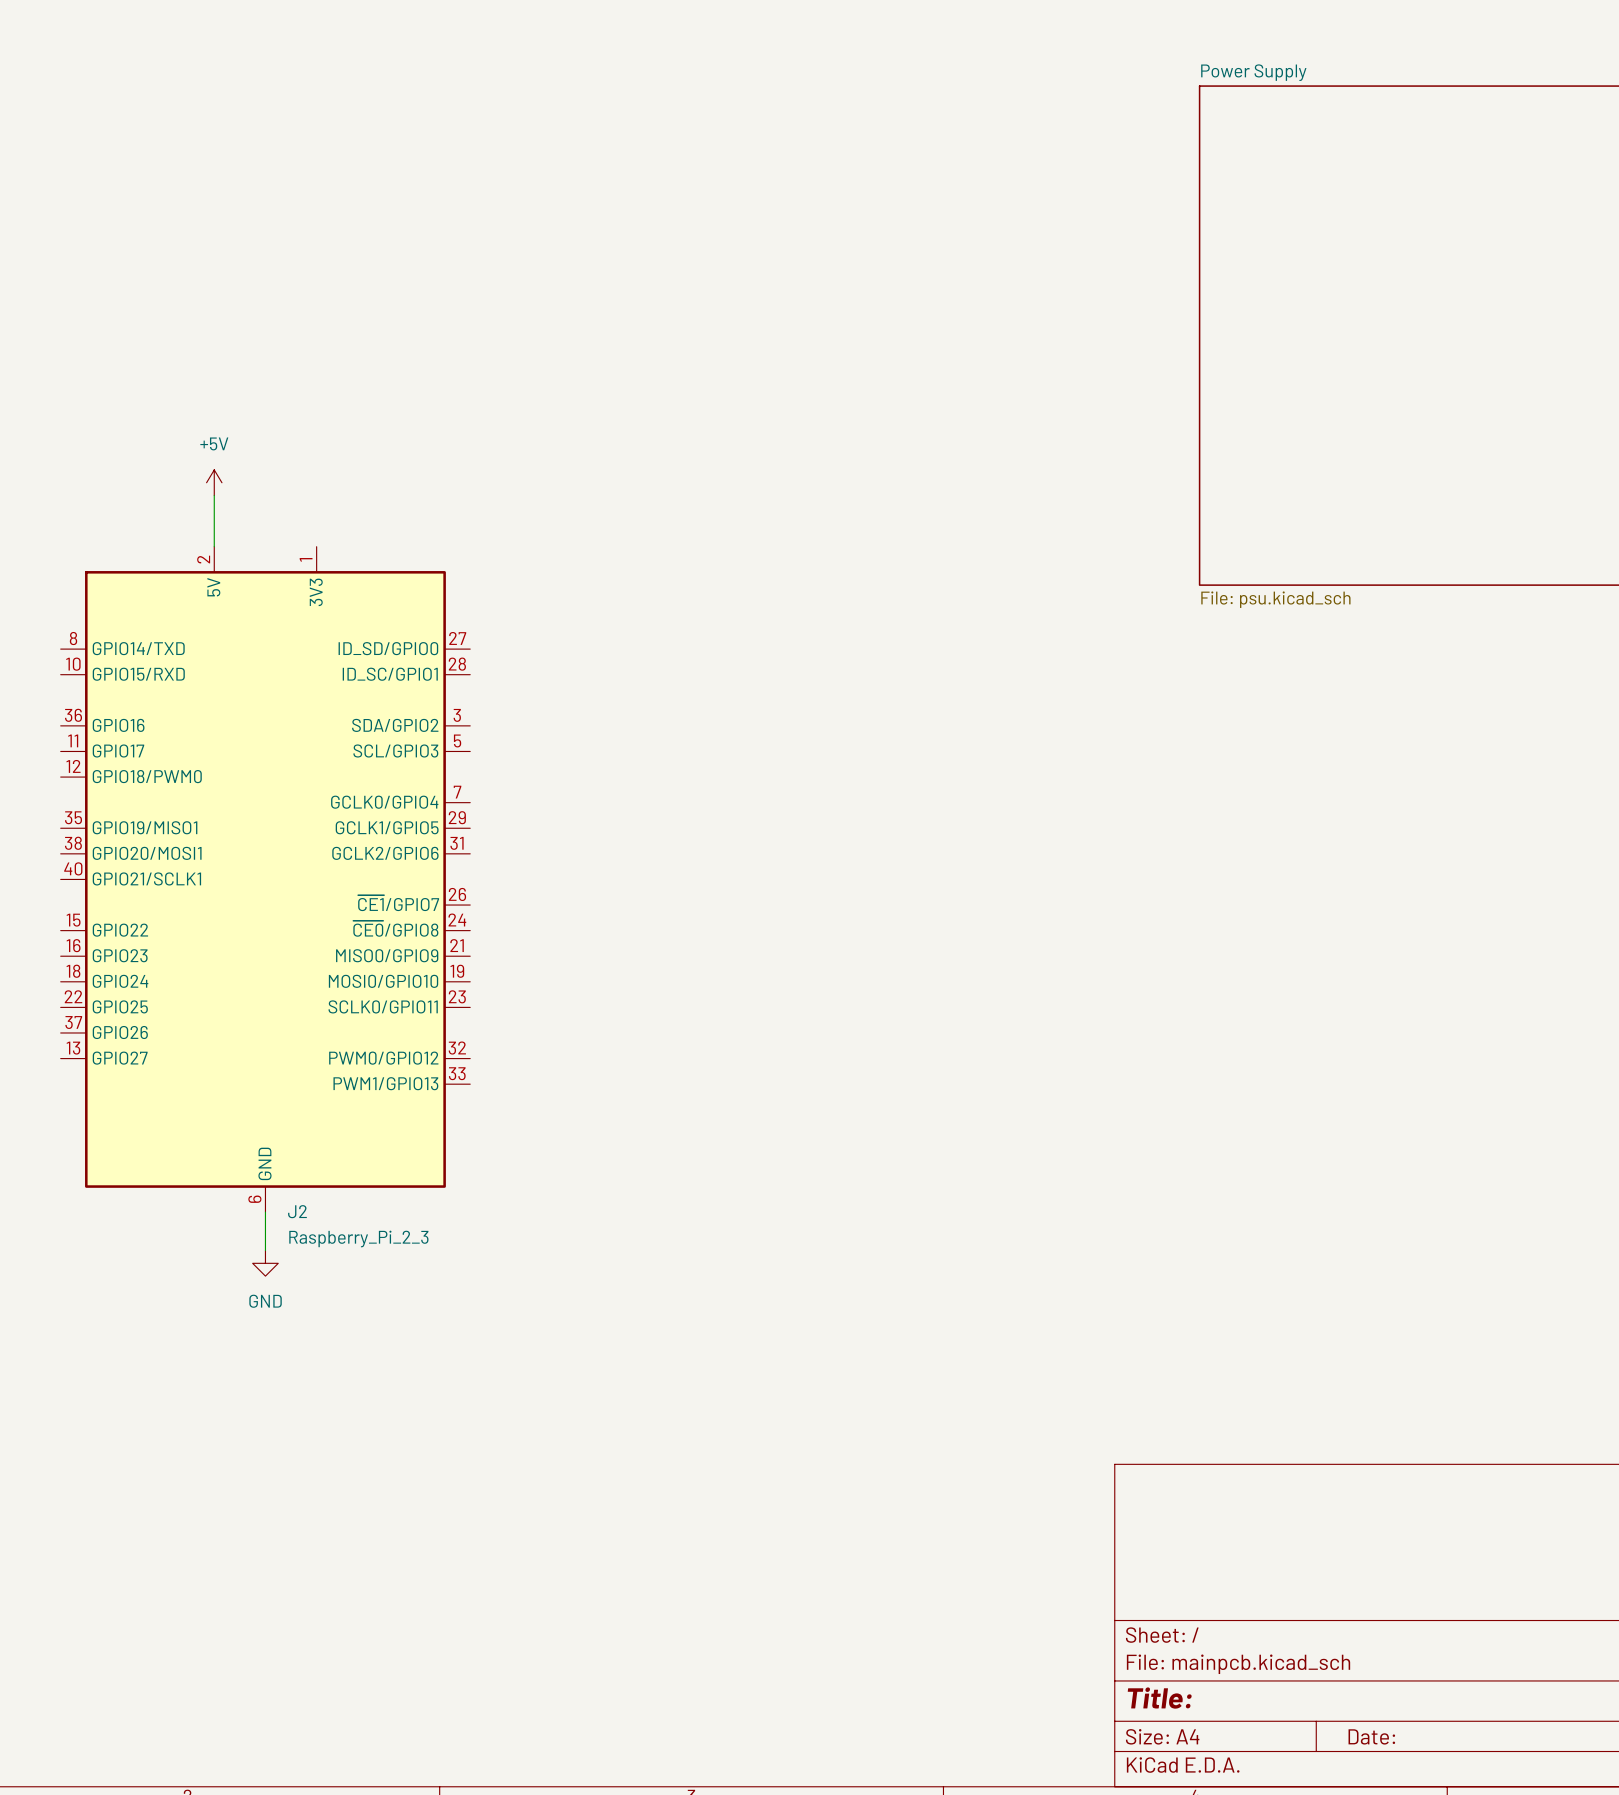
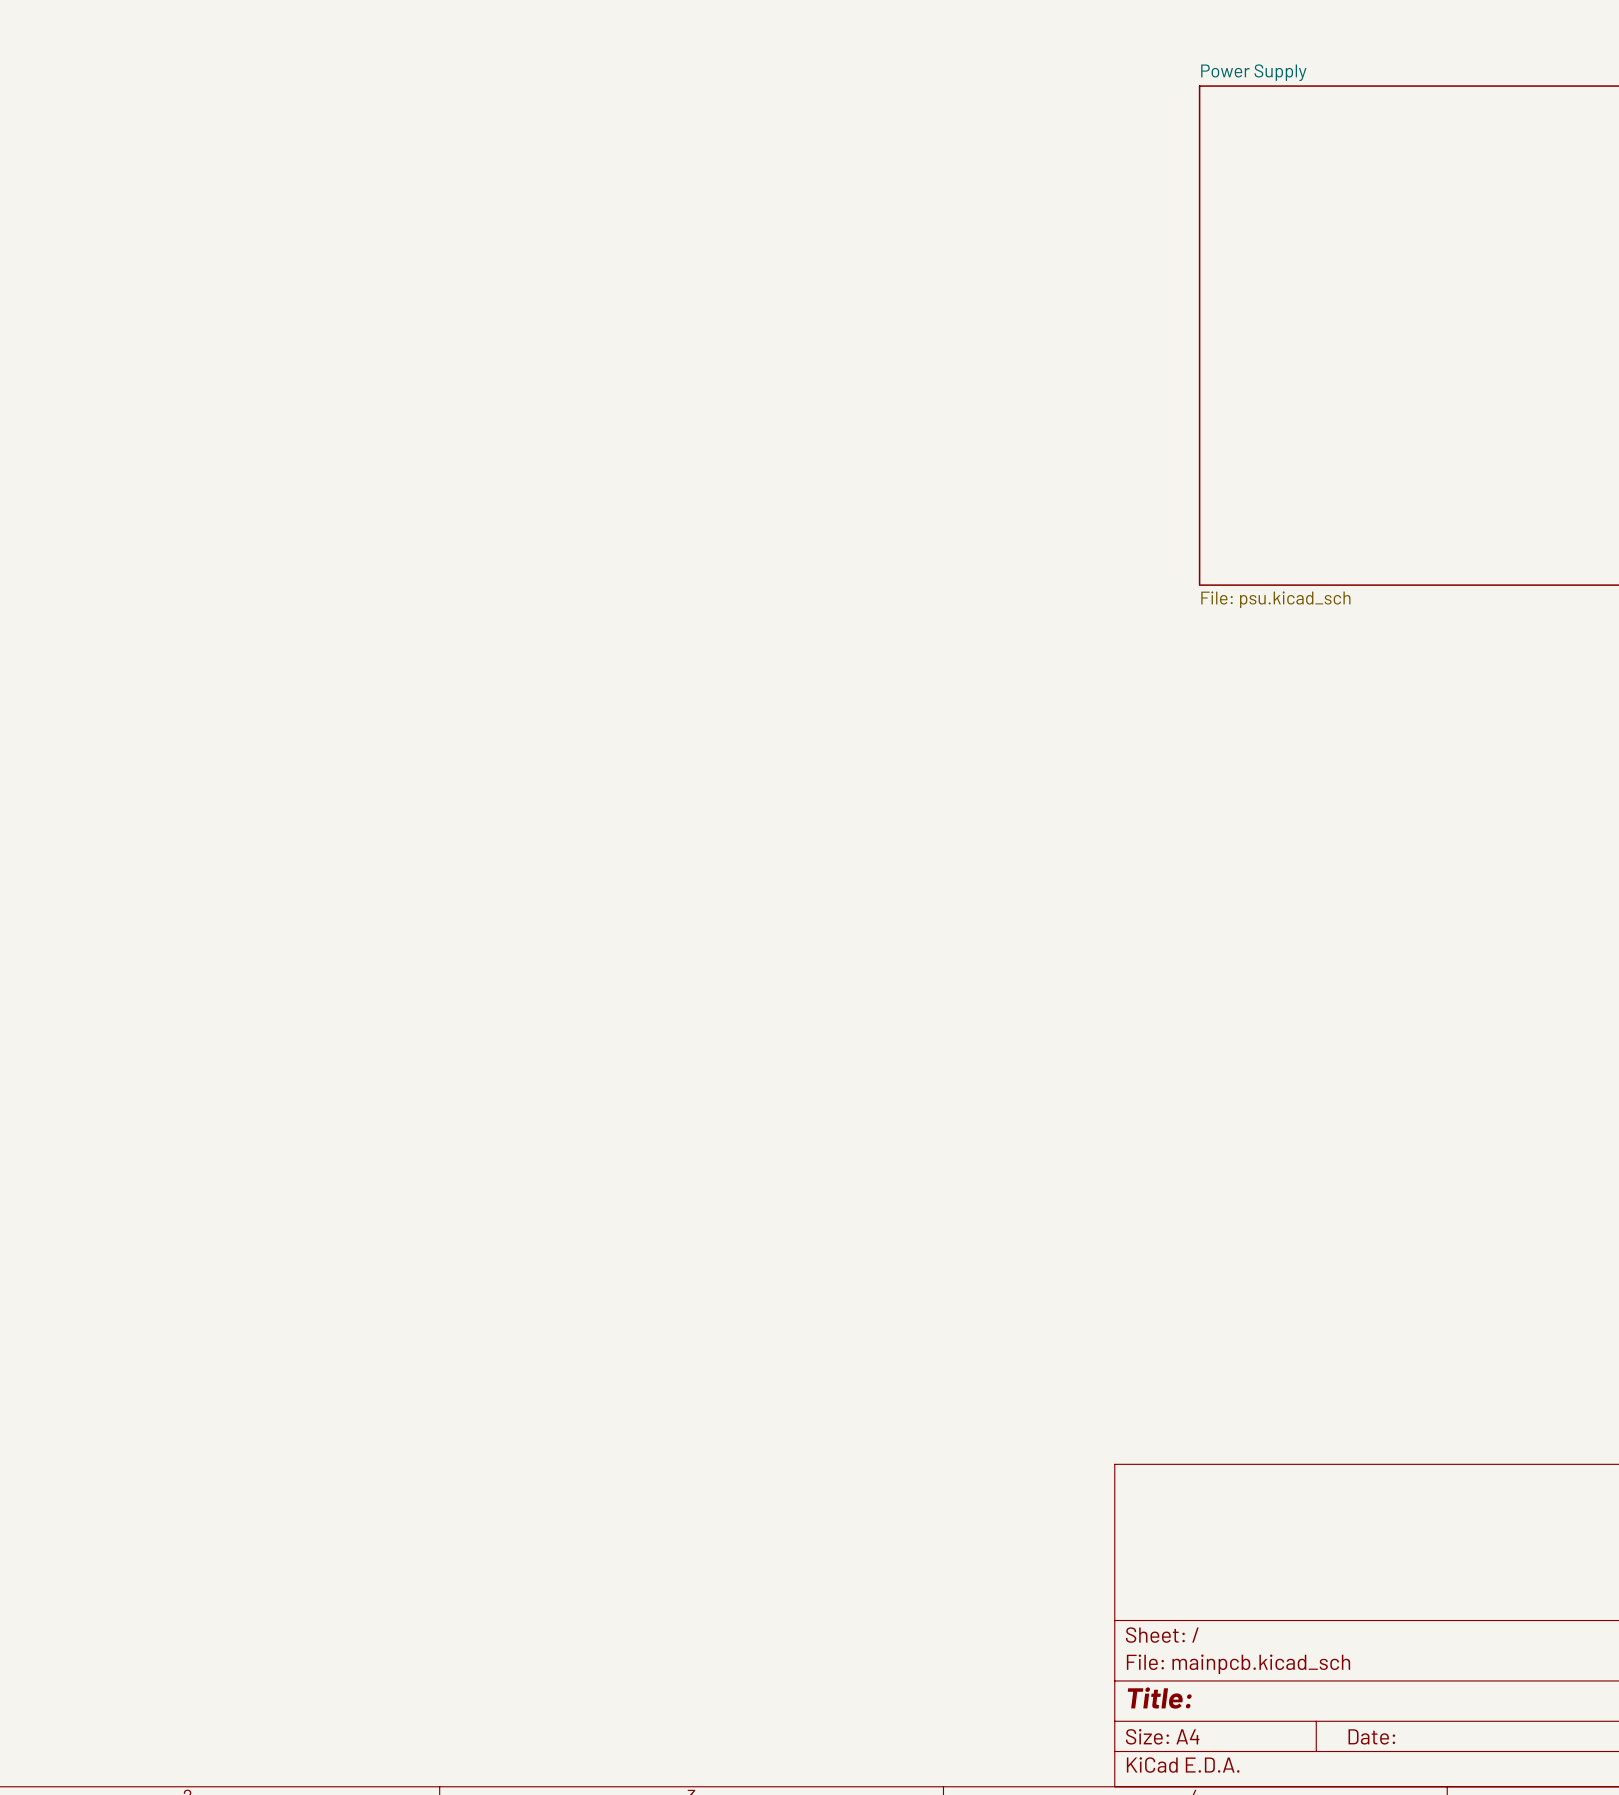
power symbol: +5V (214, 482) -> none
wire: (214, 495) (214, 546) -> none
J2: Raspberry_Pi_2_3 (265, 879) -> none
wire: (265, 1212) (265, 1250) -> none
power symbol: GND (265, 1263) -> none

